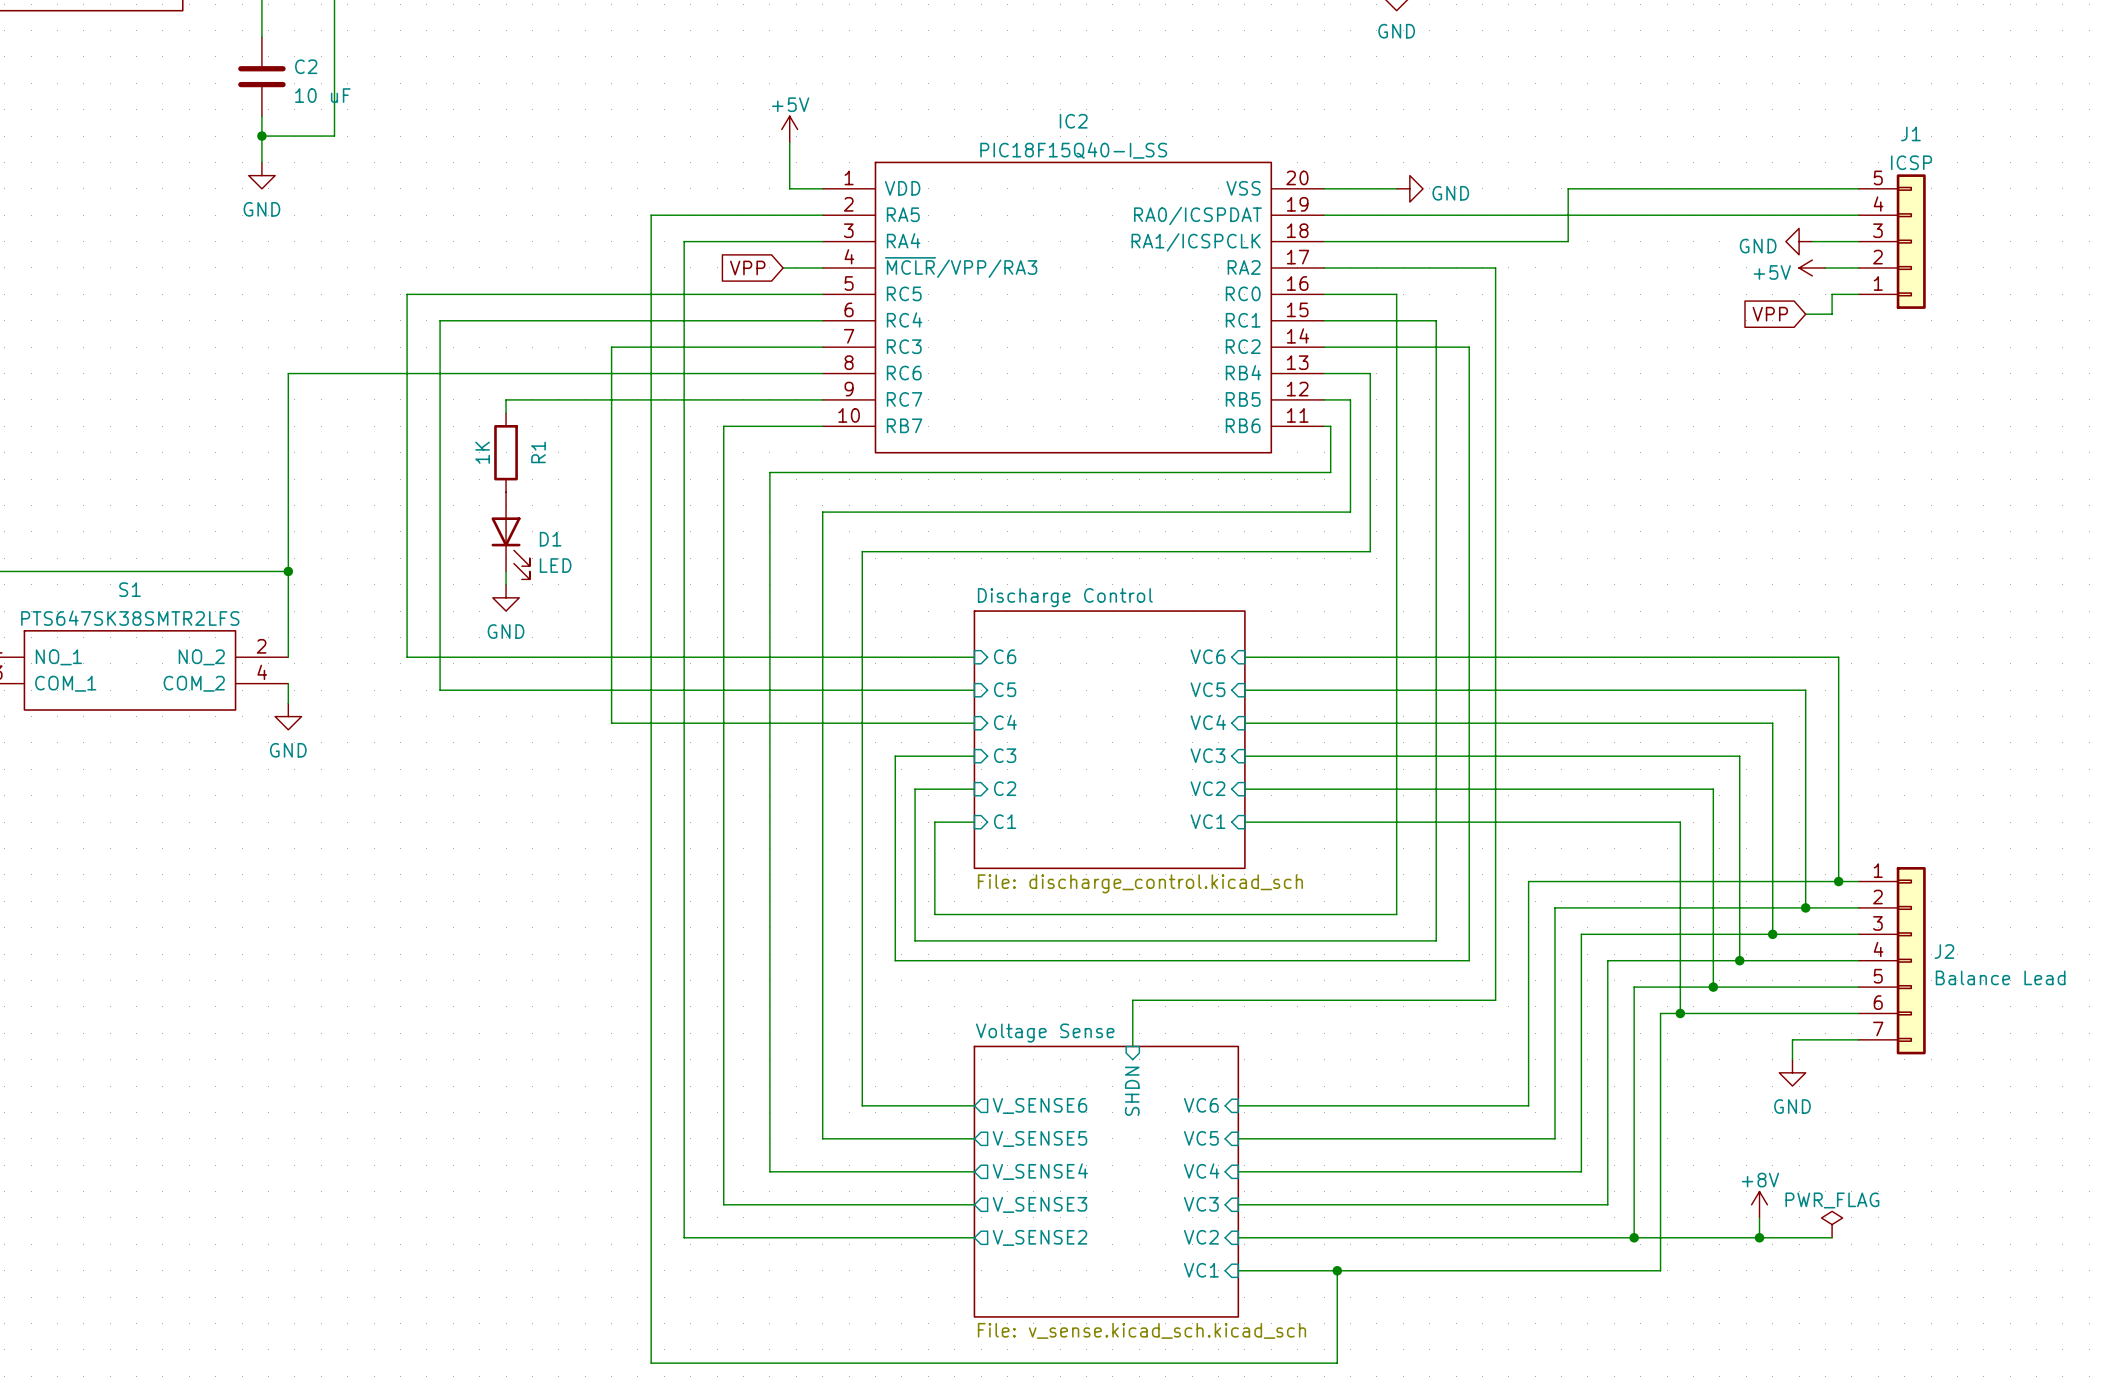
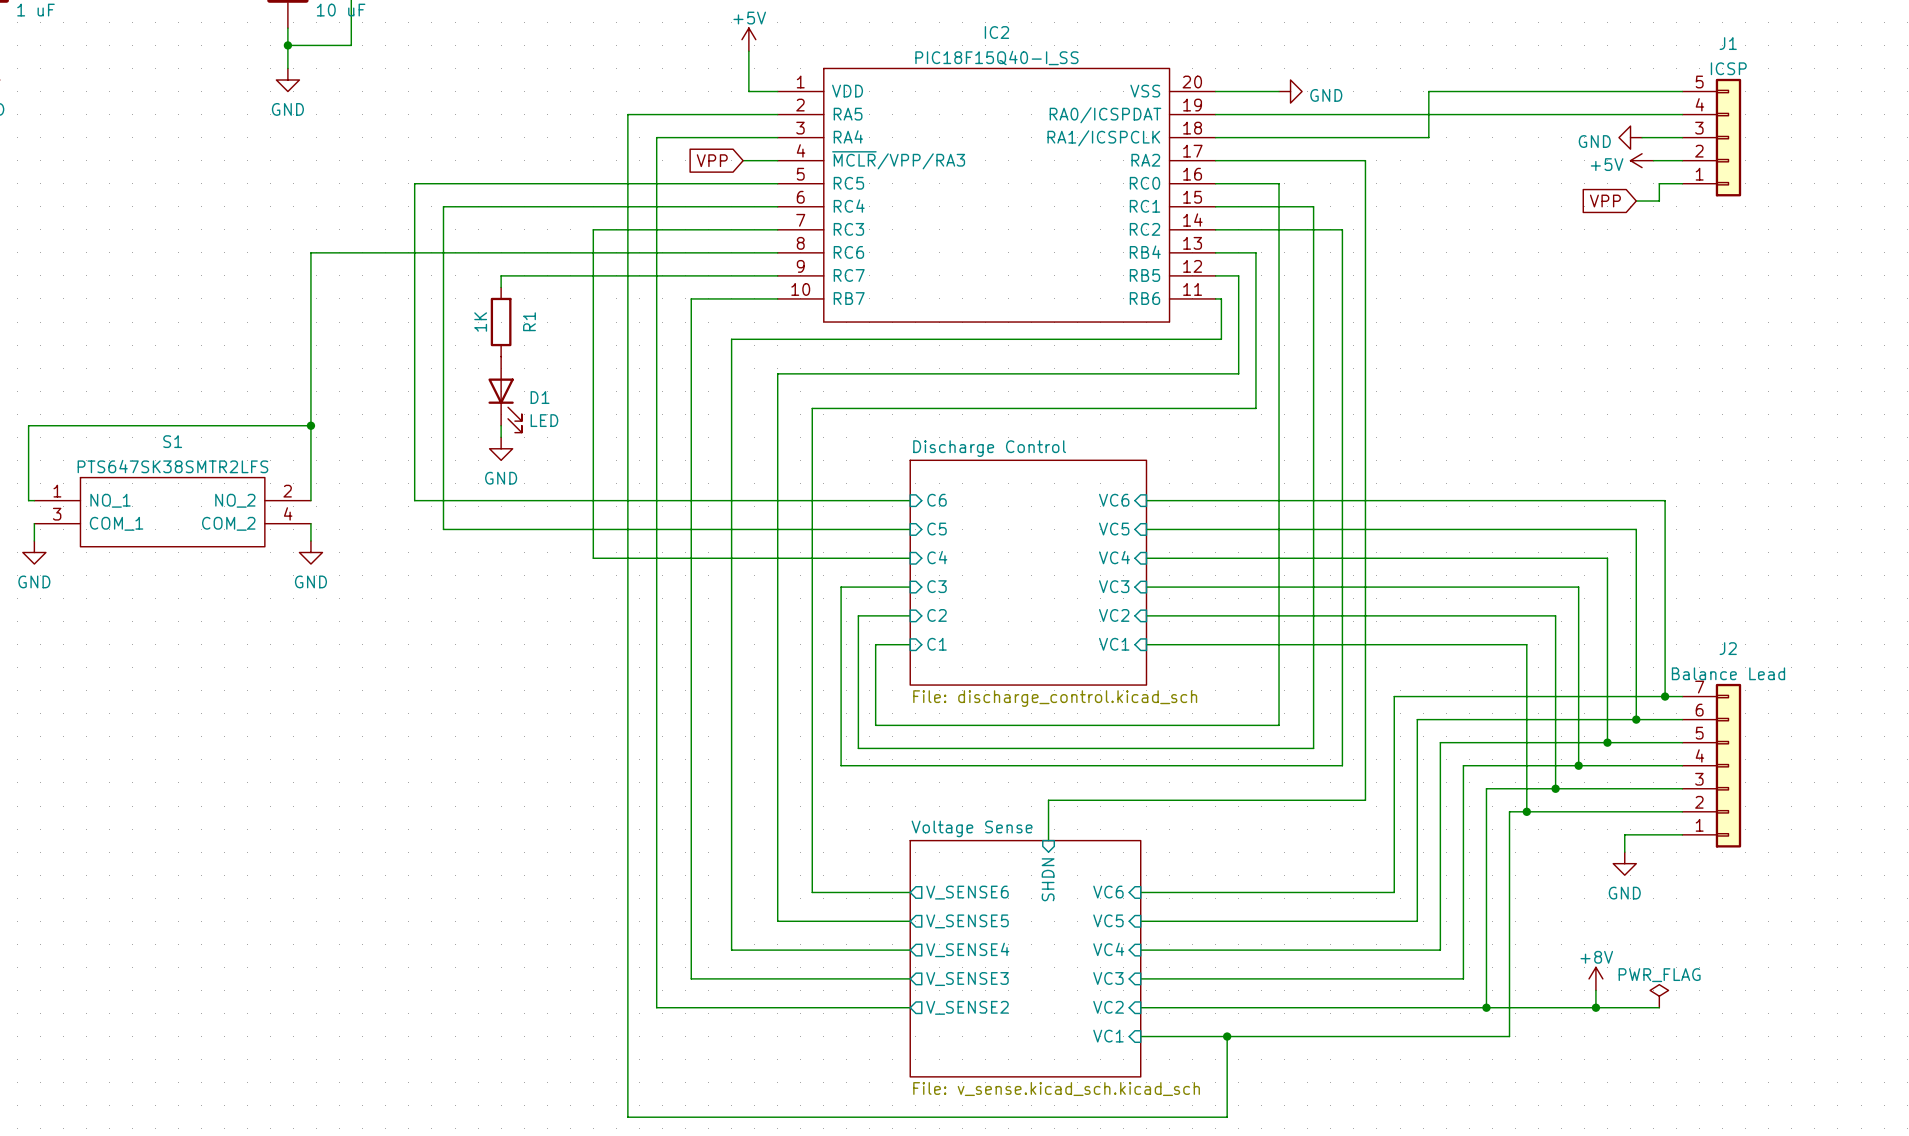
J2 name position: J2 (1944, 951) -> J2 (1728, 648)
J2 flip: as is (1911, 960) -> up-down (1728, 765)
J2 value position: Balance Lead (2000, 977) -> Balance Lead (1728, 673)

